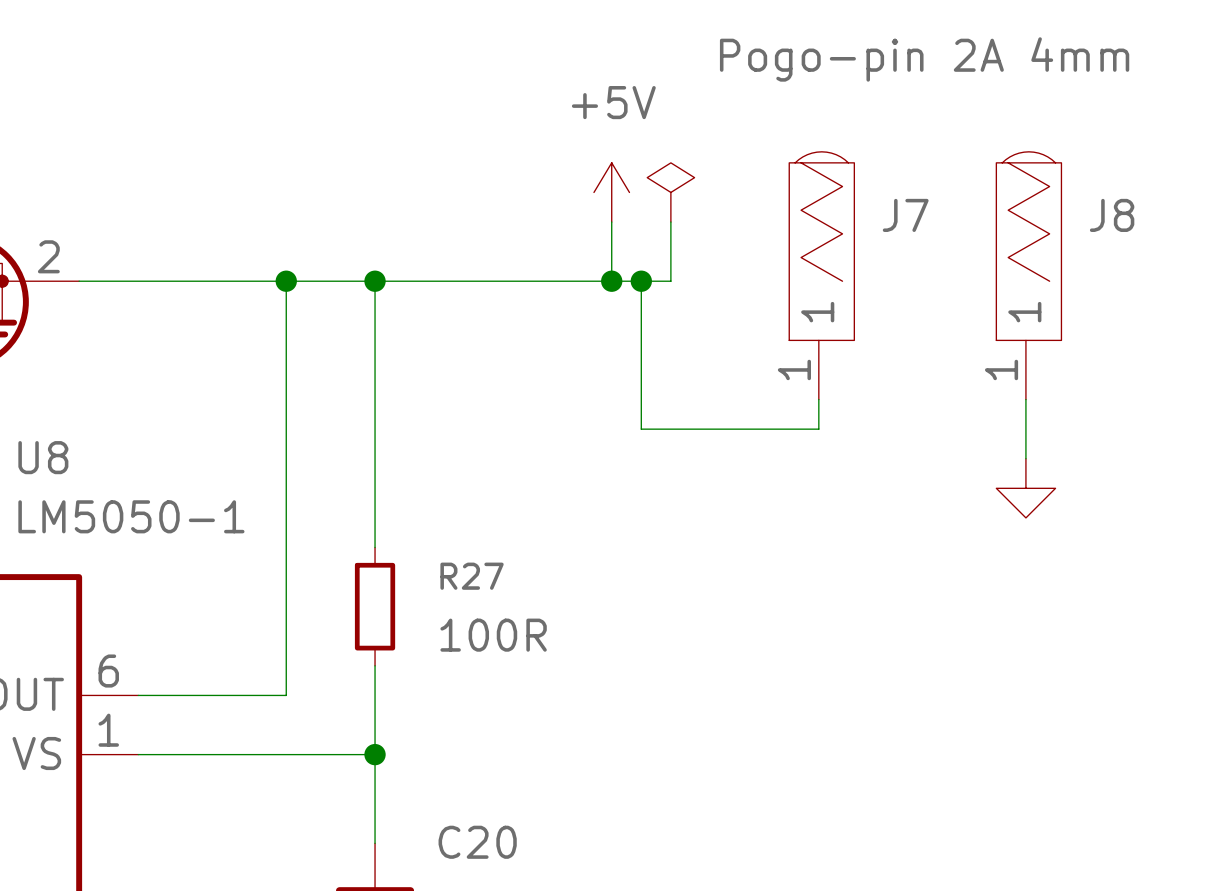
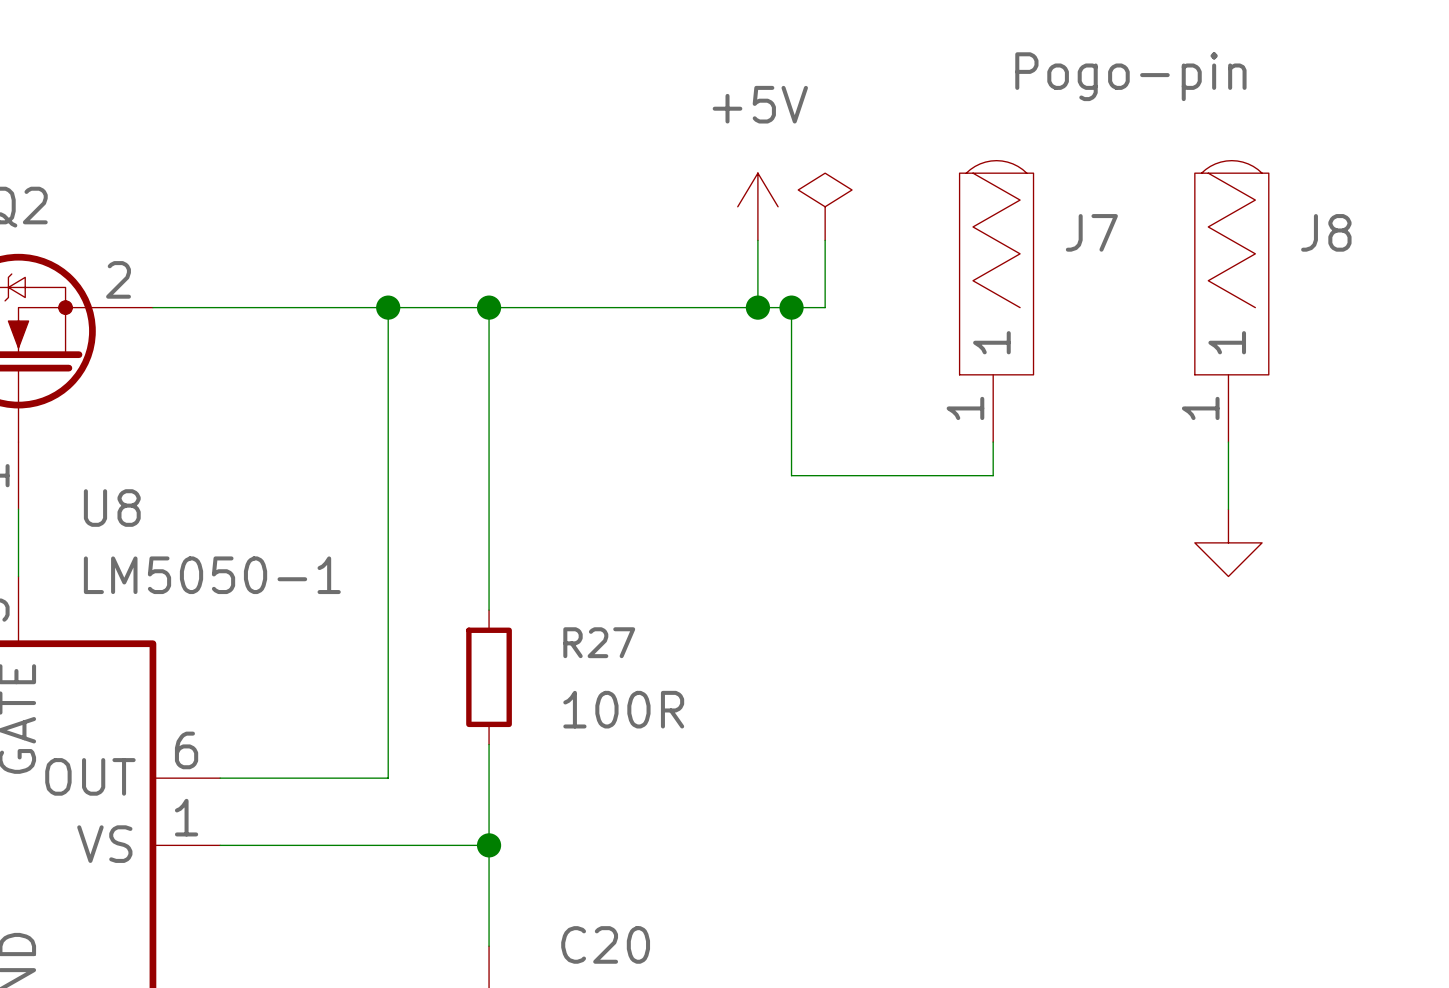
J7 value: Pogo-pin 2A 4mm (924, 59) -> Pogo-pin (1130, 76)

